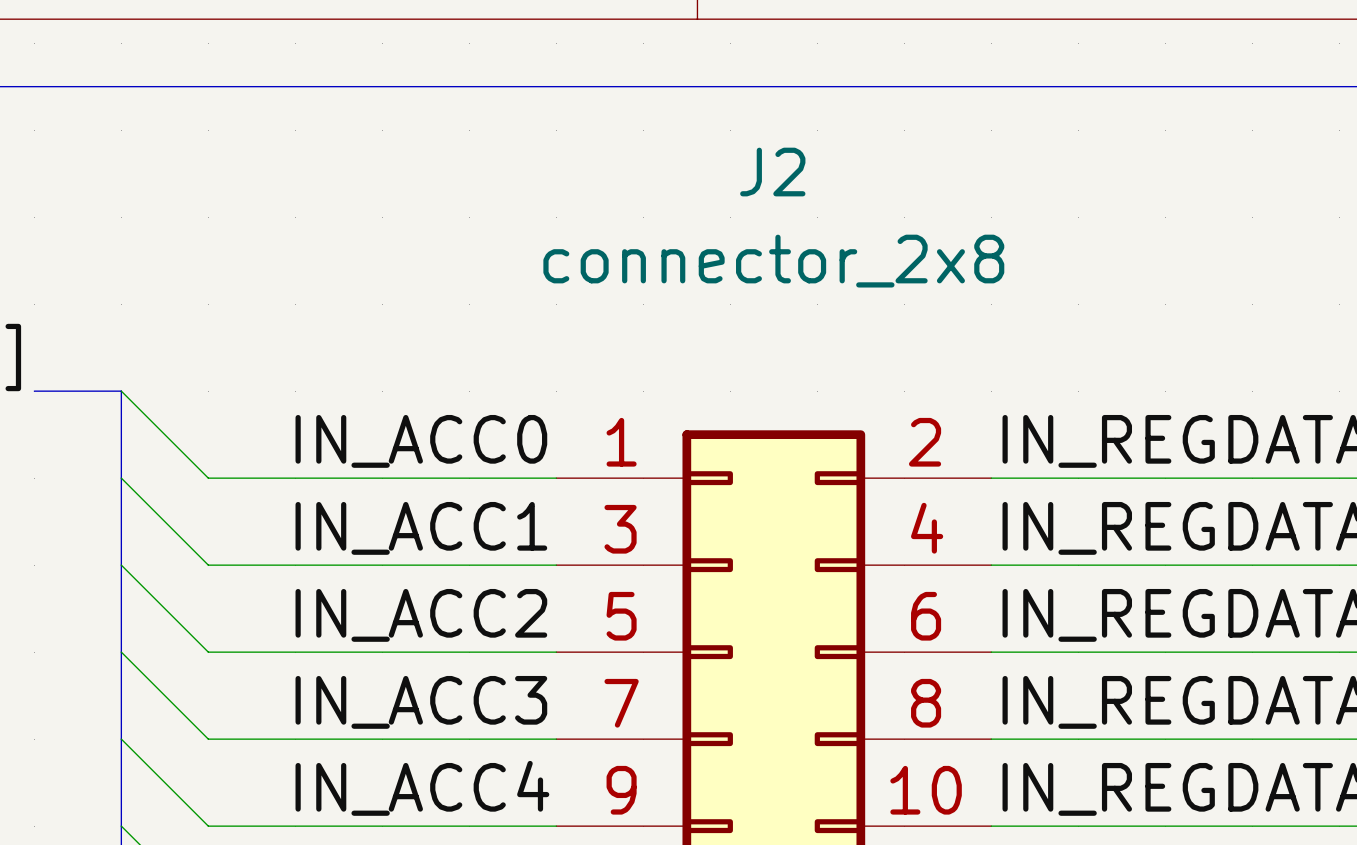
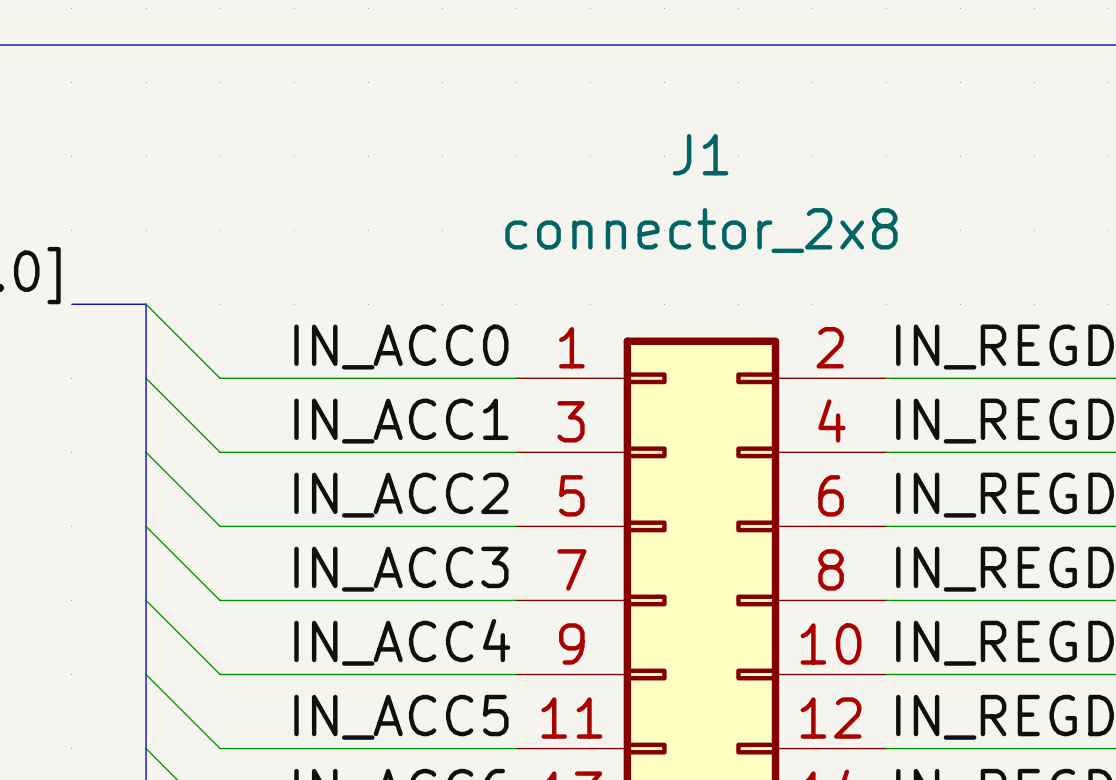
J2 name: J2 (772, 172) -> J1 (700, 154)
J2 value position: connector_2x8 (773, 261) -> connector_2x8 (701, 230)

